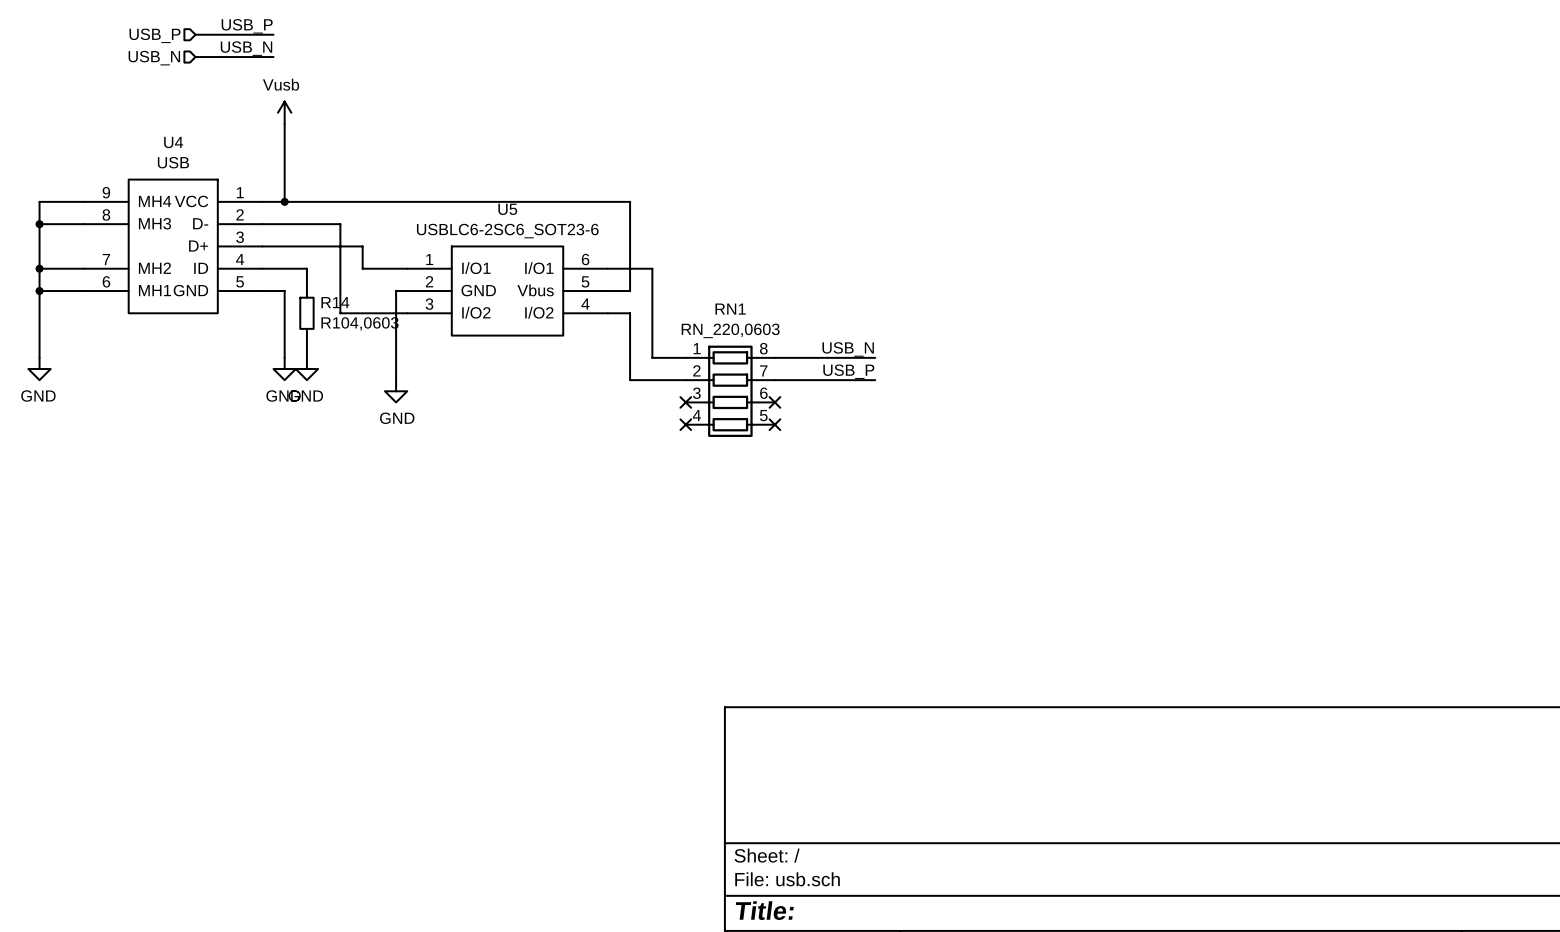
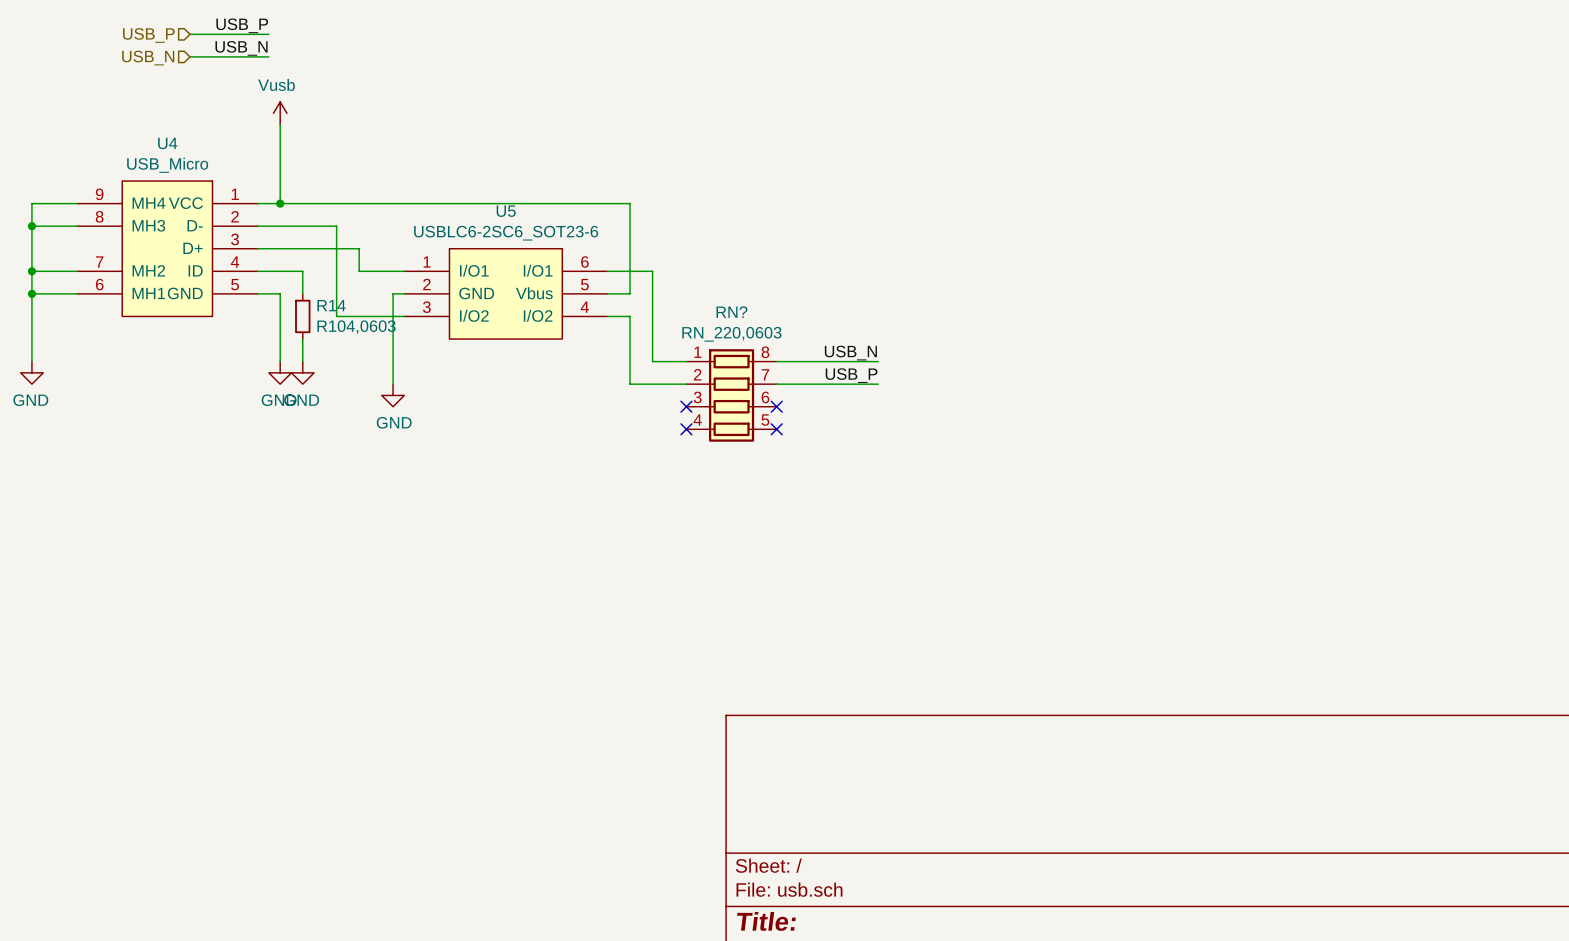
U4 value: USB (173, 162) -> USB_Micro (167, 165)
RN1 name: RN1 (730, 309) -> RN? (731, 312)

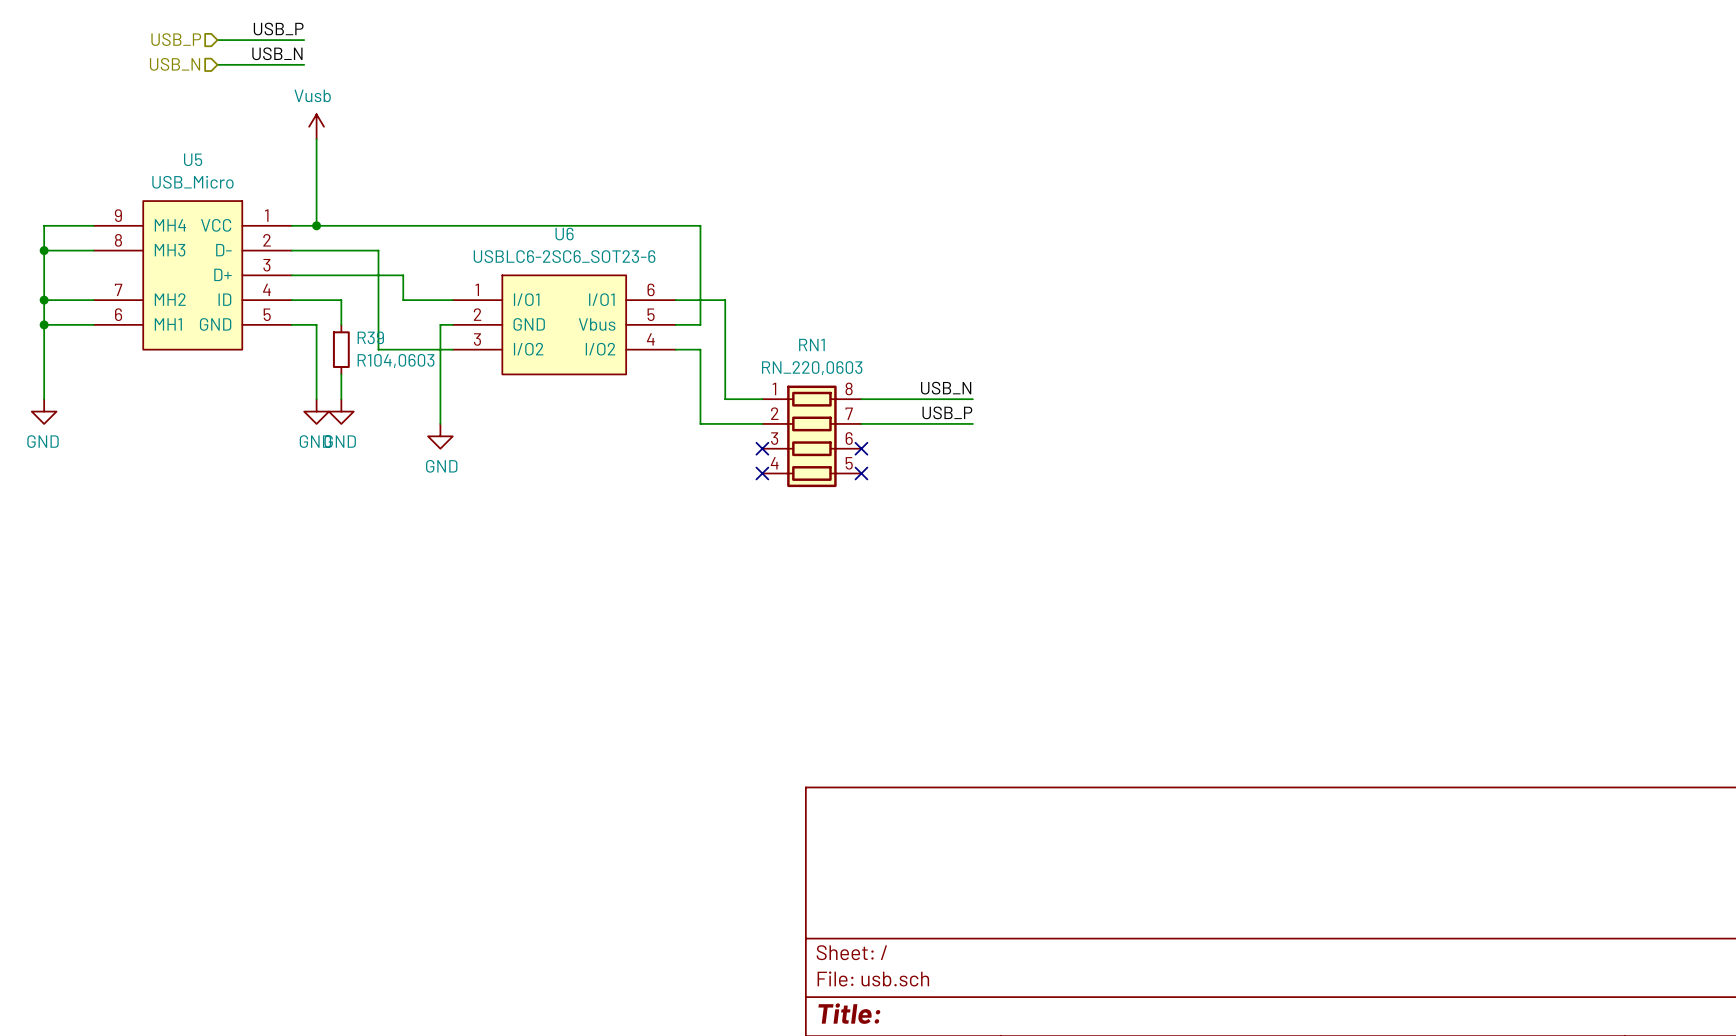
U4 name: U4 (167, 143) -> U5 (193, 159)
U5 name: U5 (506, 211) -> U6 (564, 234)
R14 name: R14 (331, 305) -> R39 (370, 337)
RN? name: RN? (731, 312) -> RN1 (811, 344)

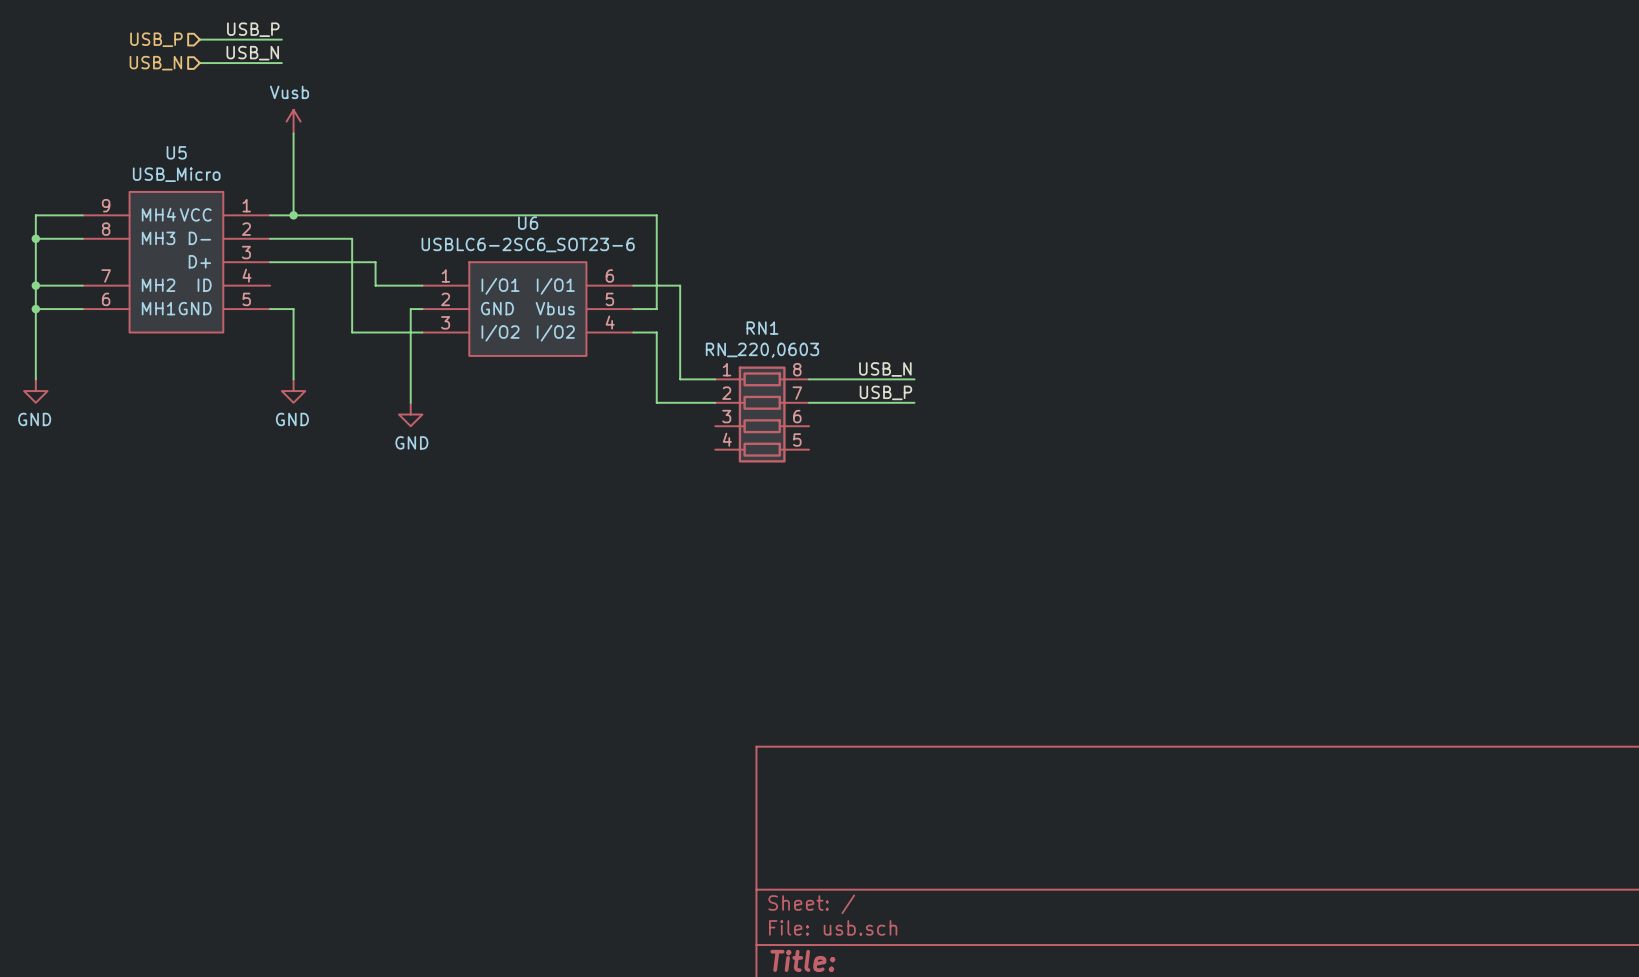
wire: (291, 300) (341, 300) (341, 324) -> none
R39: R104,0603 (341, 349) -> none
wire: (341, 374) (341, 399) -> none
power symbol: GND (341, 411) -> none
no-connect mark: (762, 448) -> none
no-connect mark: (861, 448) -> none
no-connect mark: (762, 473) -> none
no-connect mark: (861, 473) -> none

